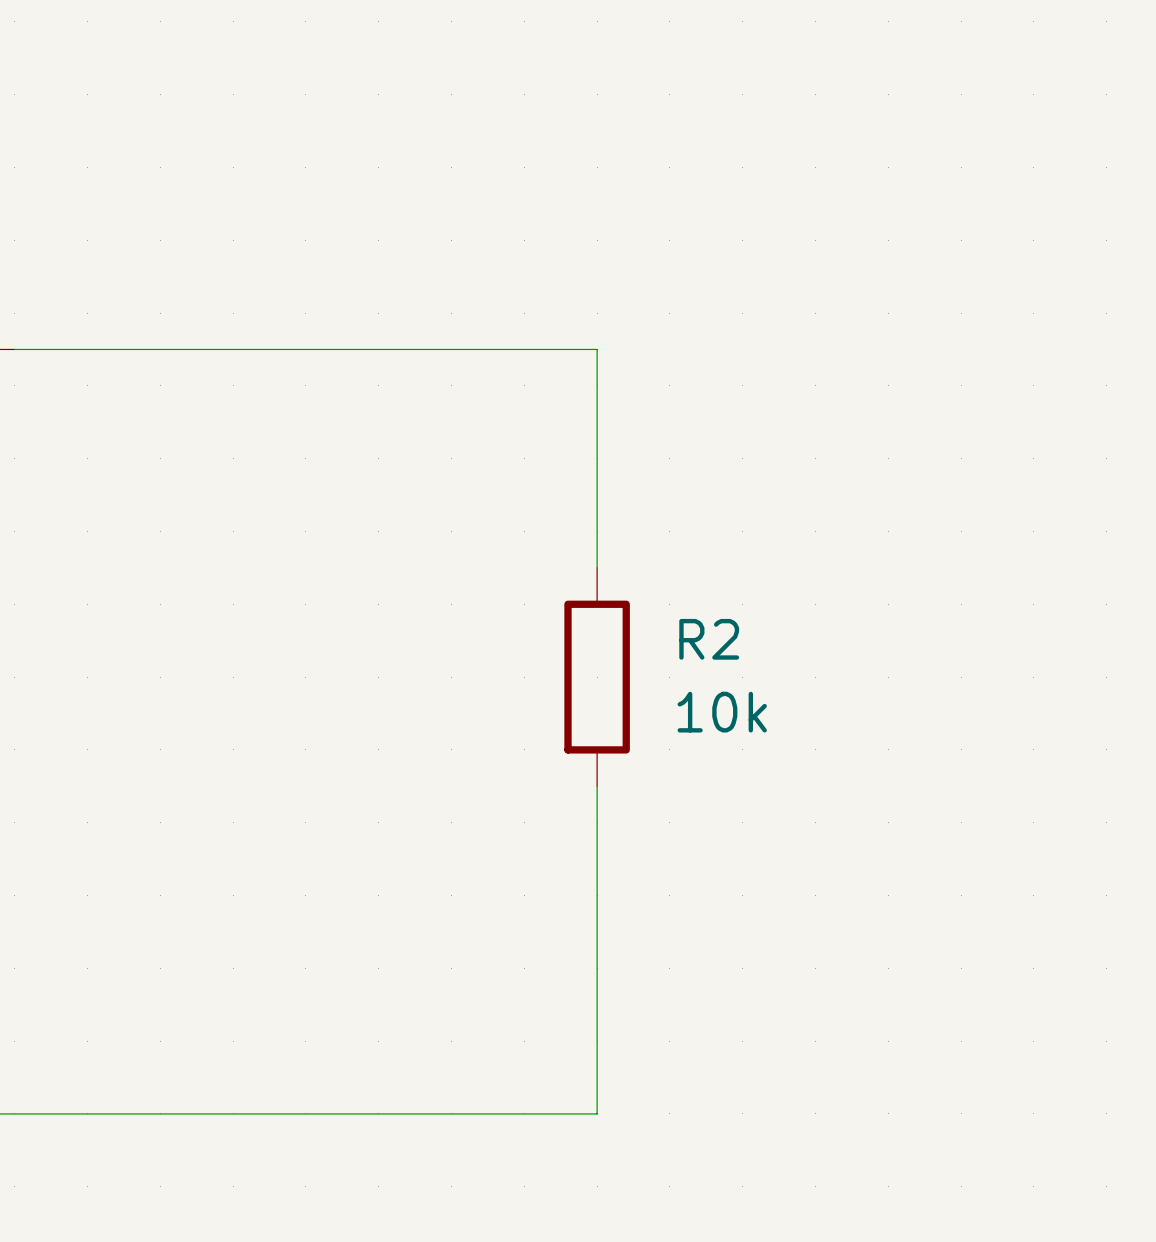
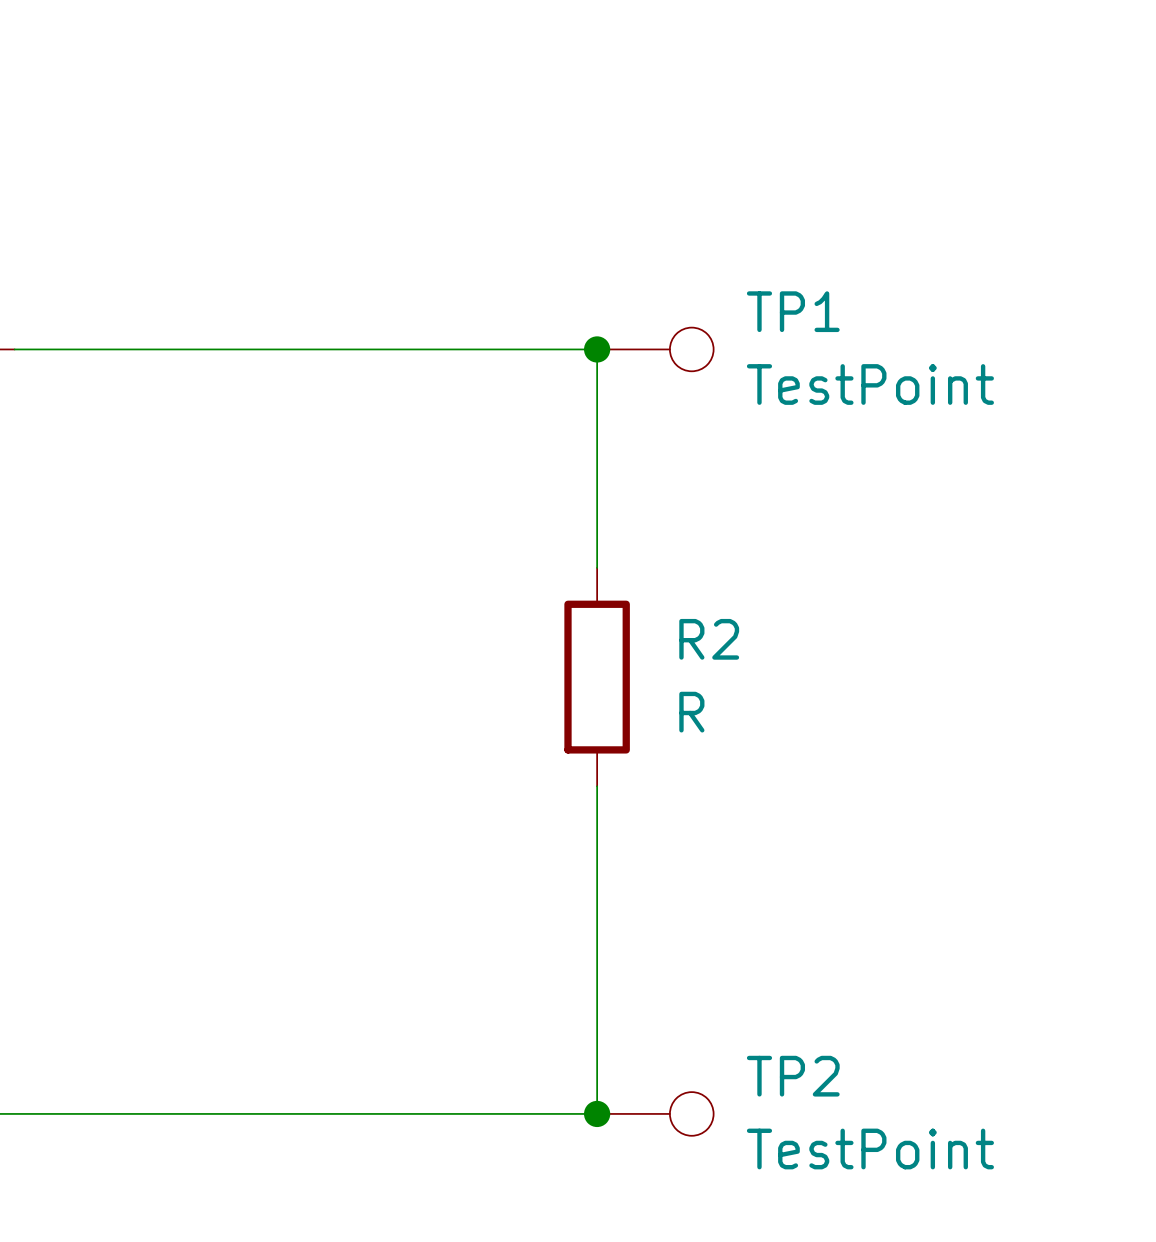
junction: none -> (597, 349)
TP1: none -> TestPoint (655, 349)
R2 value: 10k (722, 712) -> R (691, 712)
junction: none -> (597, 1113)
TP2: none -> TestPoint (655, 1113)

